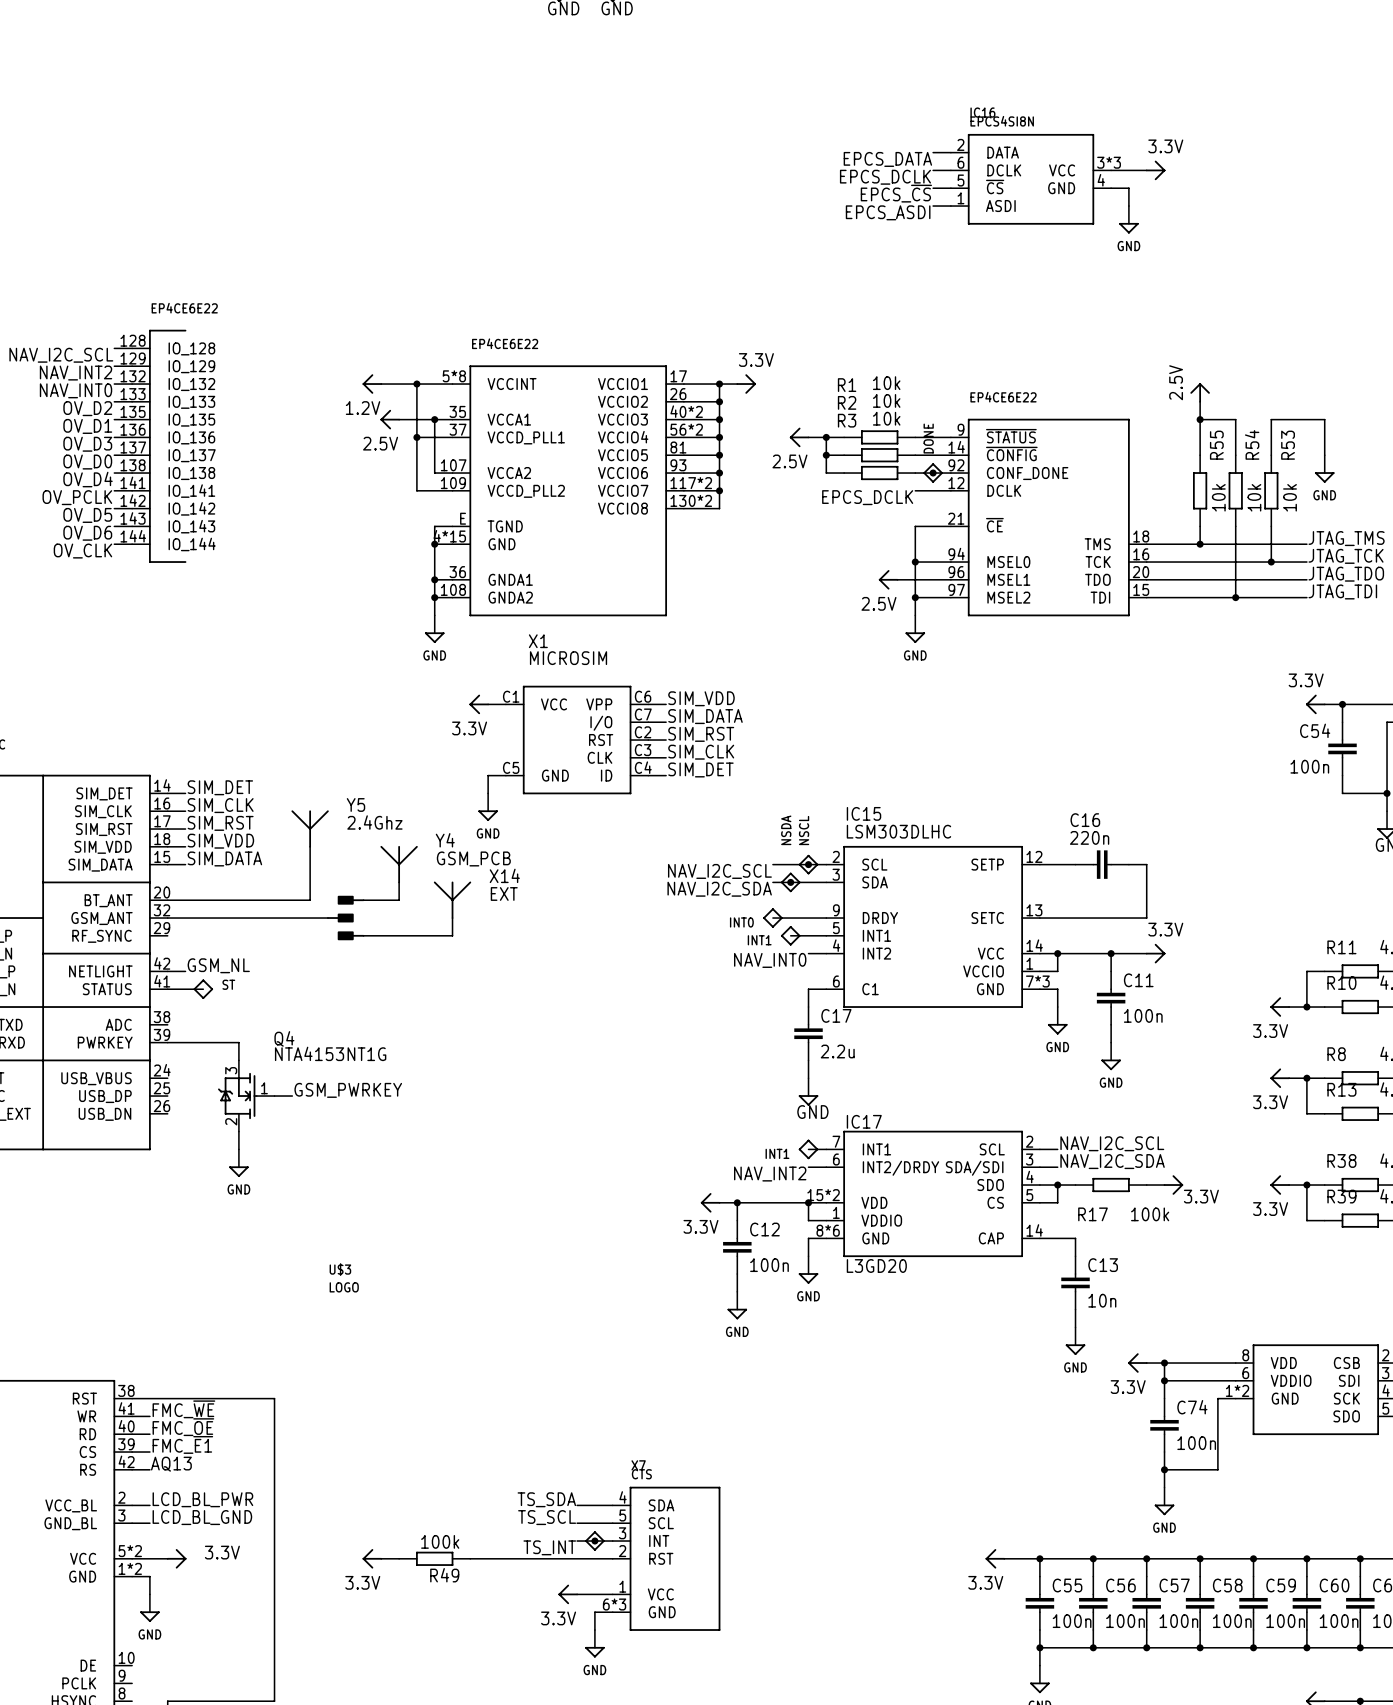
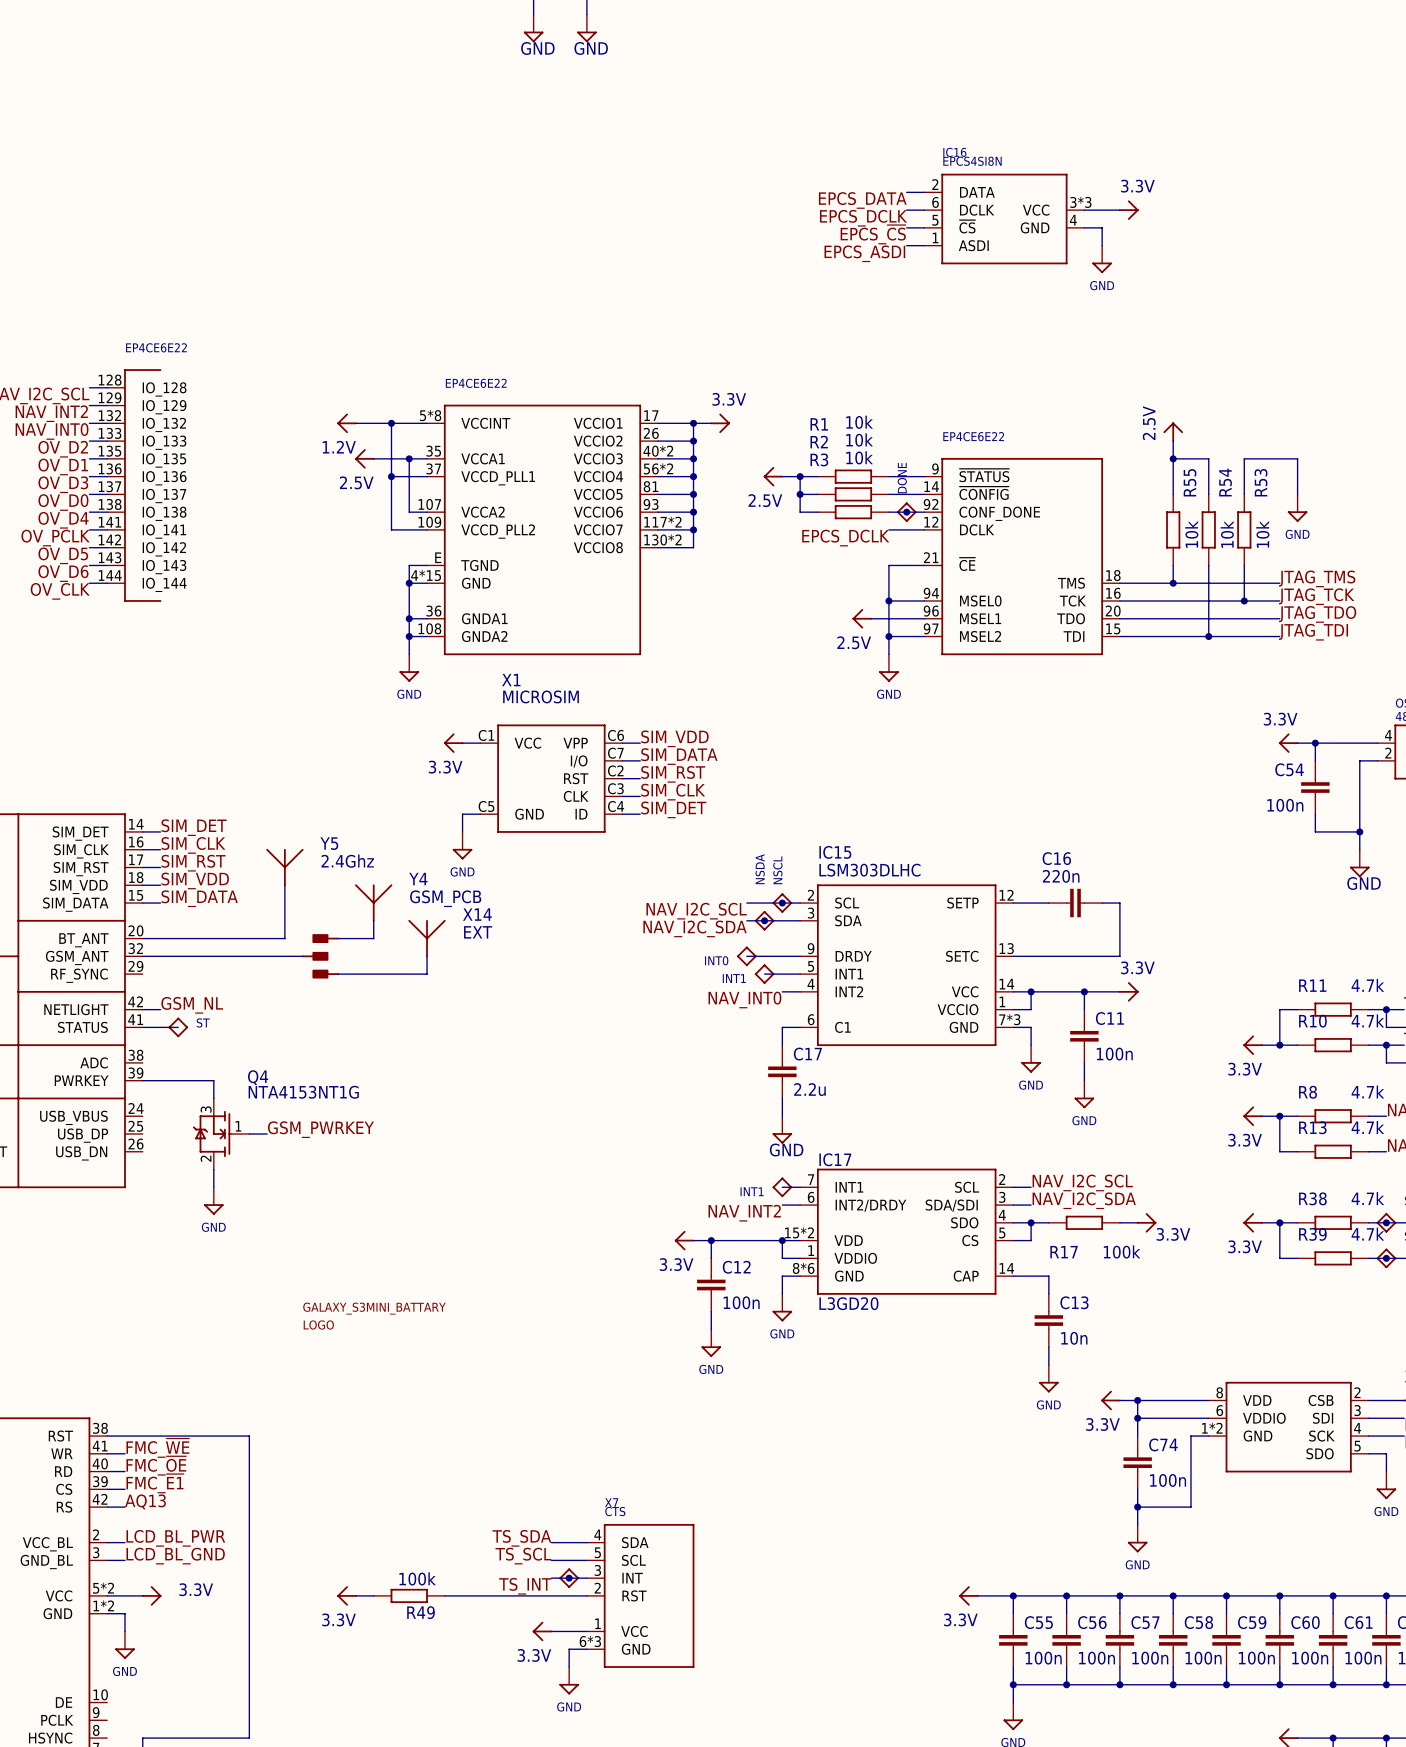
U$3: (340, 1269) -> none
part: none -> (374, 1308)

